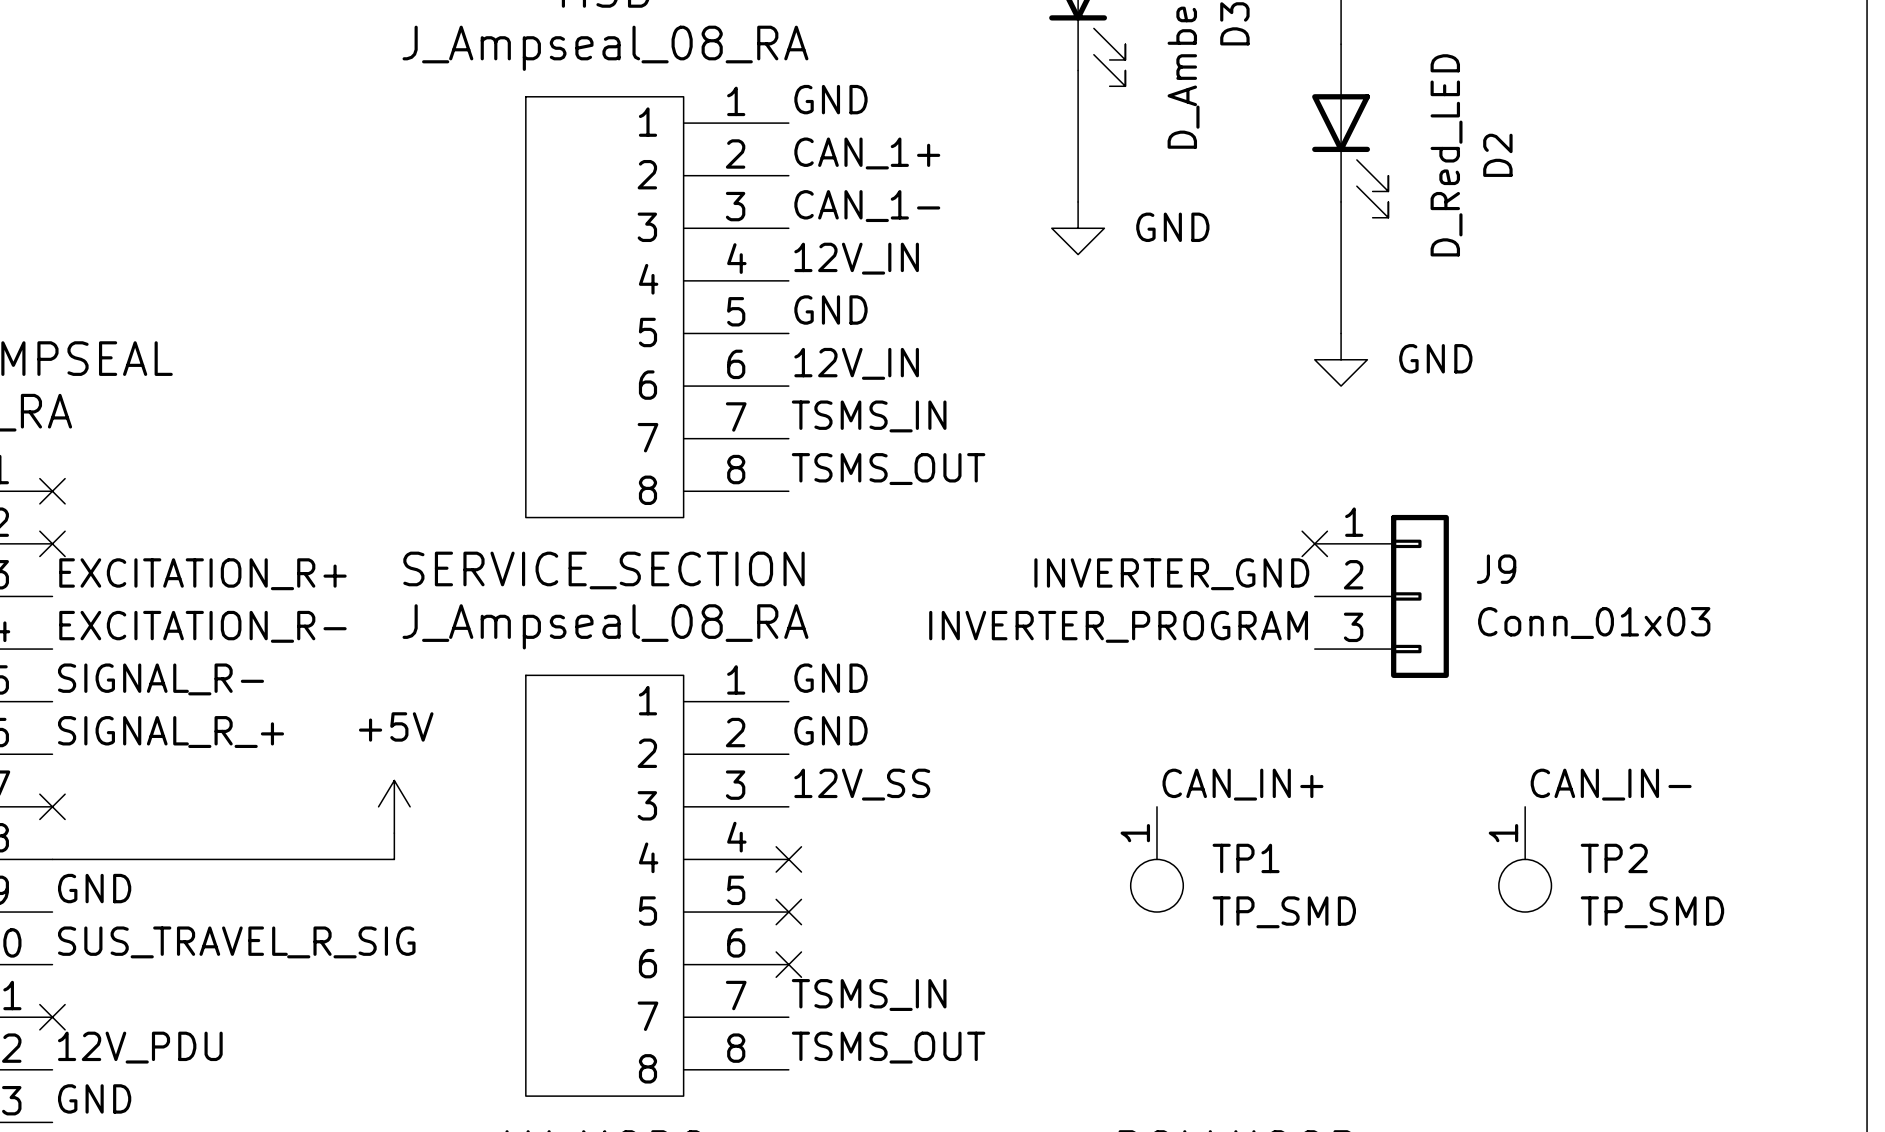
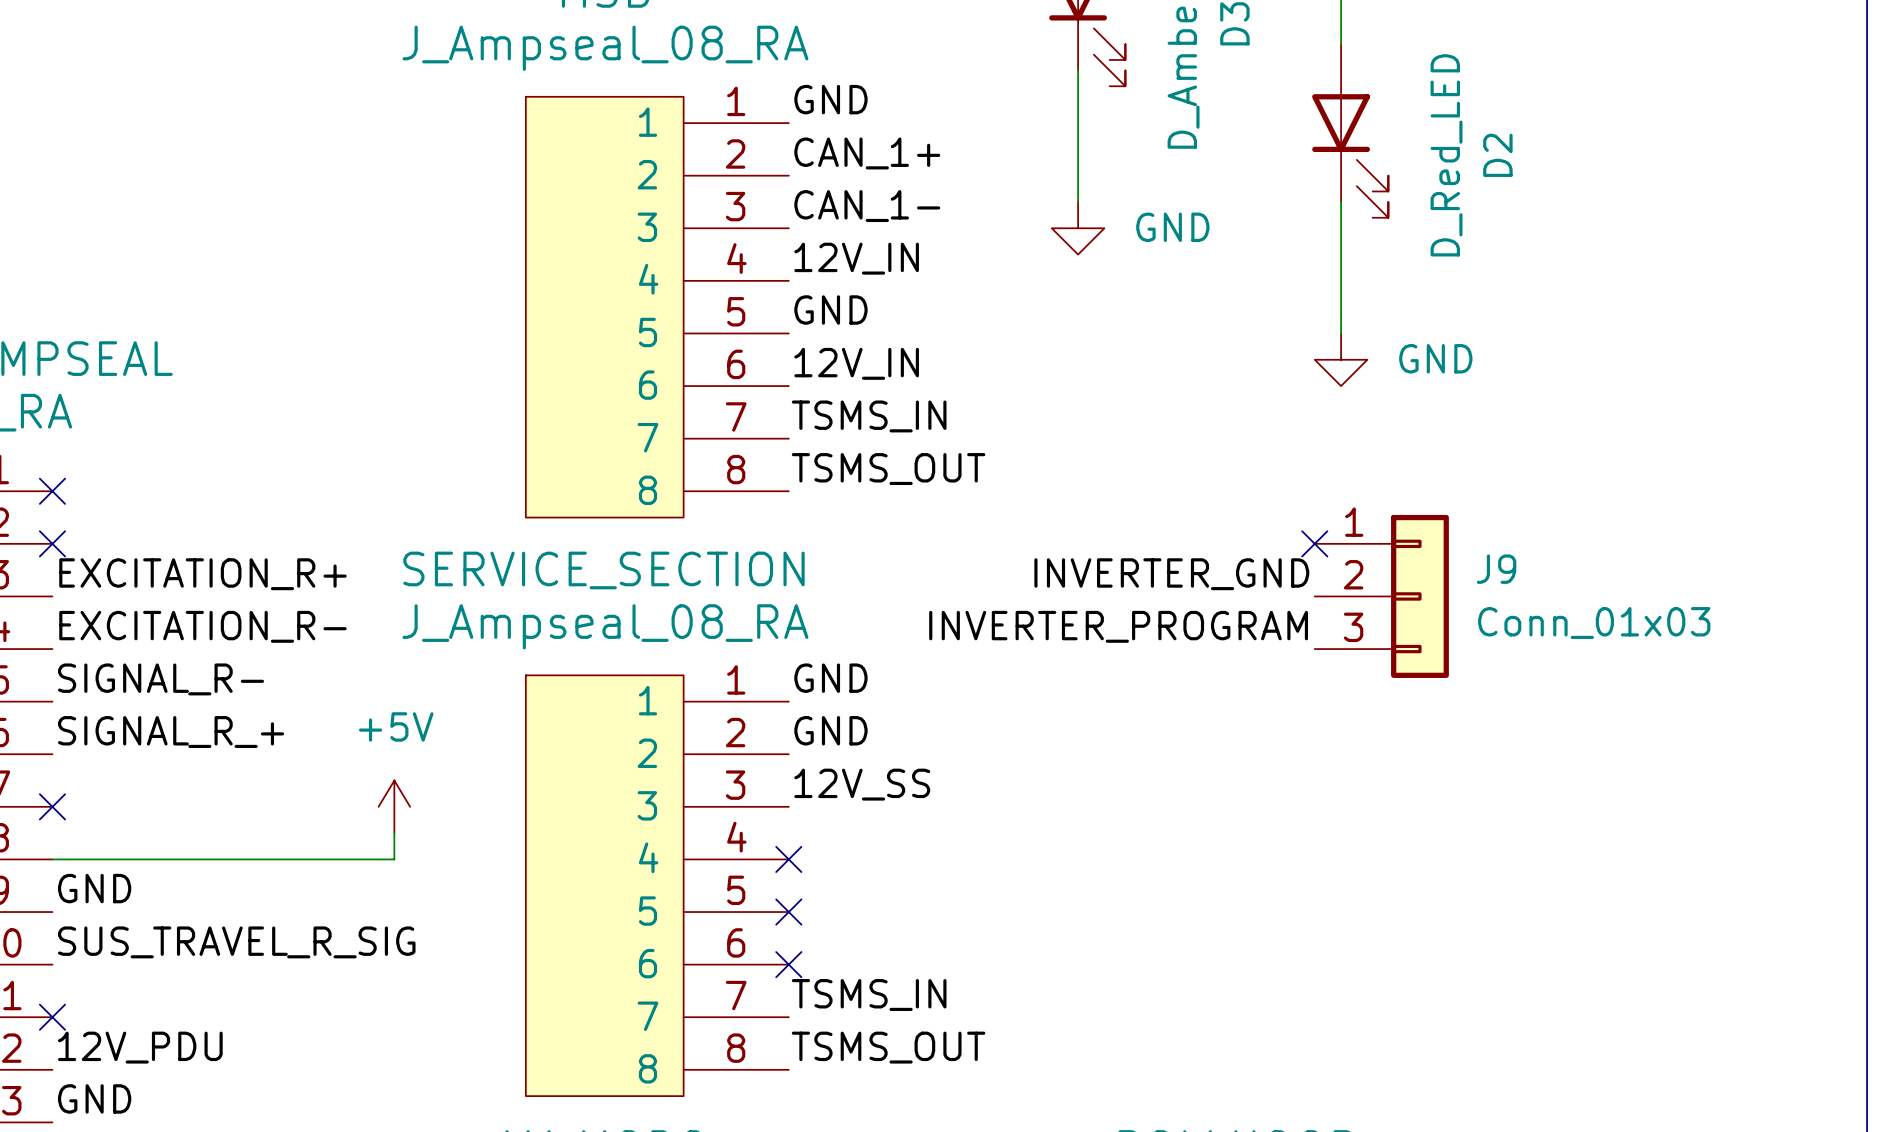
label: CAN_IN+ (1242, 784) -> none
label: CAN_IN- (1611, 784) -> none
TP1: TP_SMD (1156, 859) -> none
TP2: TP_SMD (1525, 859) -> none

